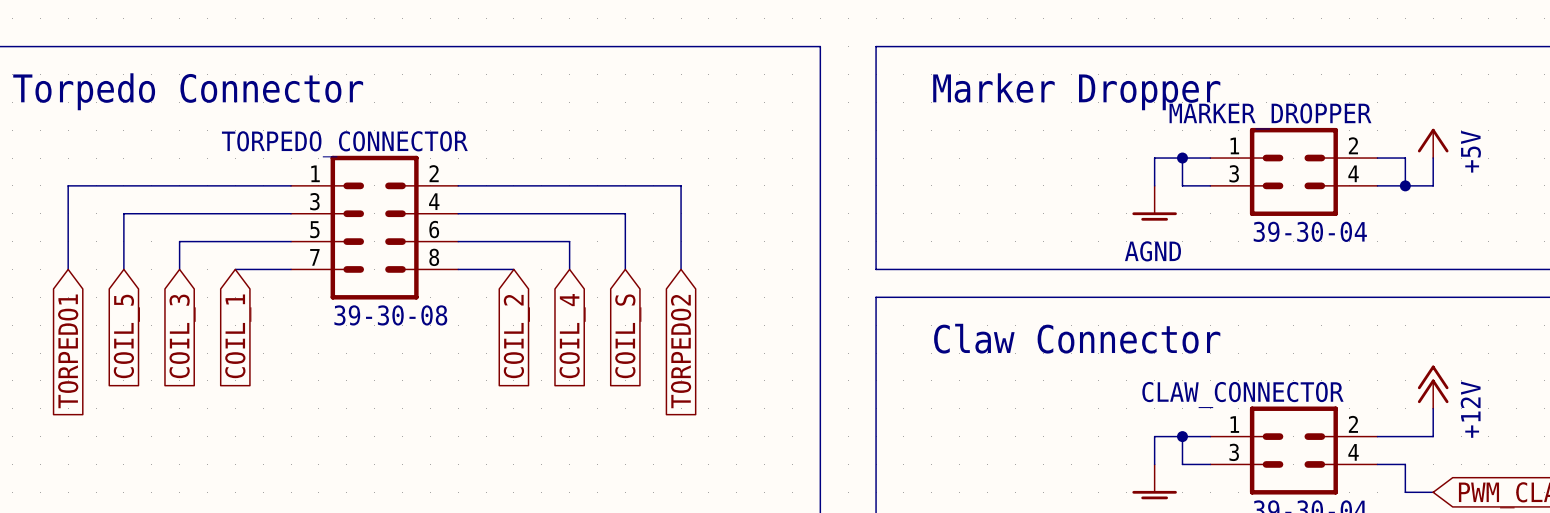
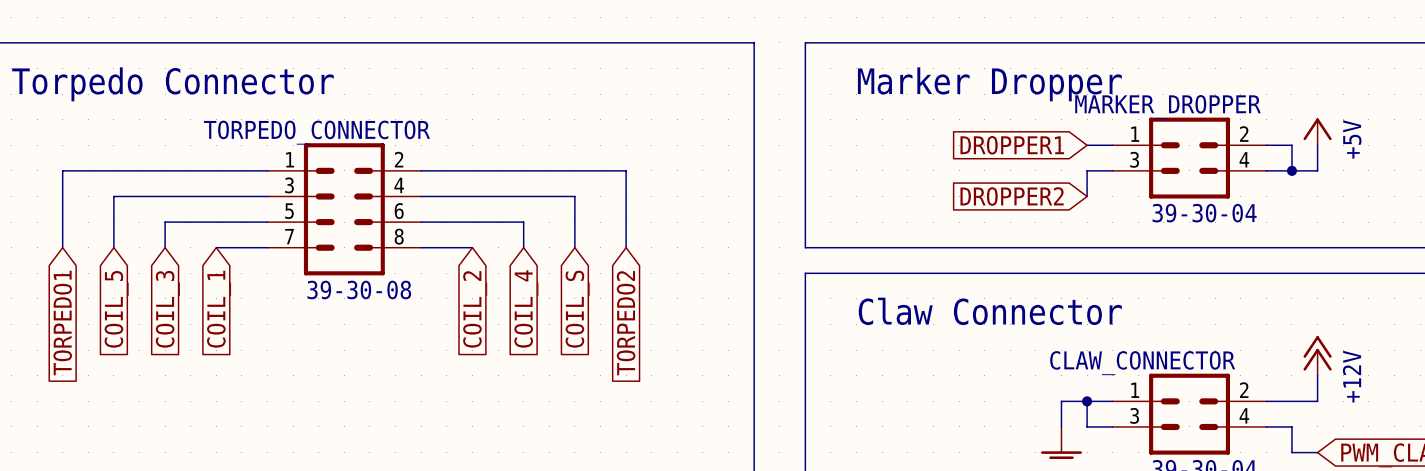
global label: none -> DROPPER1 (1012, 145)
junction: (1182, 158) -> none
wire: (1154, 185) (1154, 158) (1182, 158) (1182, 185) -> (1087, 196) (1087, 170)
power symbol: AGND (1154, 203) -> none
global label: none -> DROPPER2 (1012, 196)

